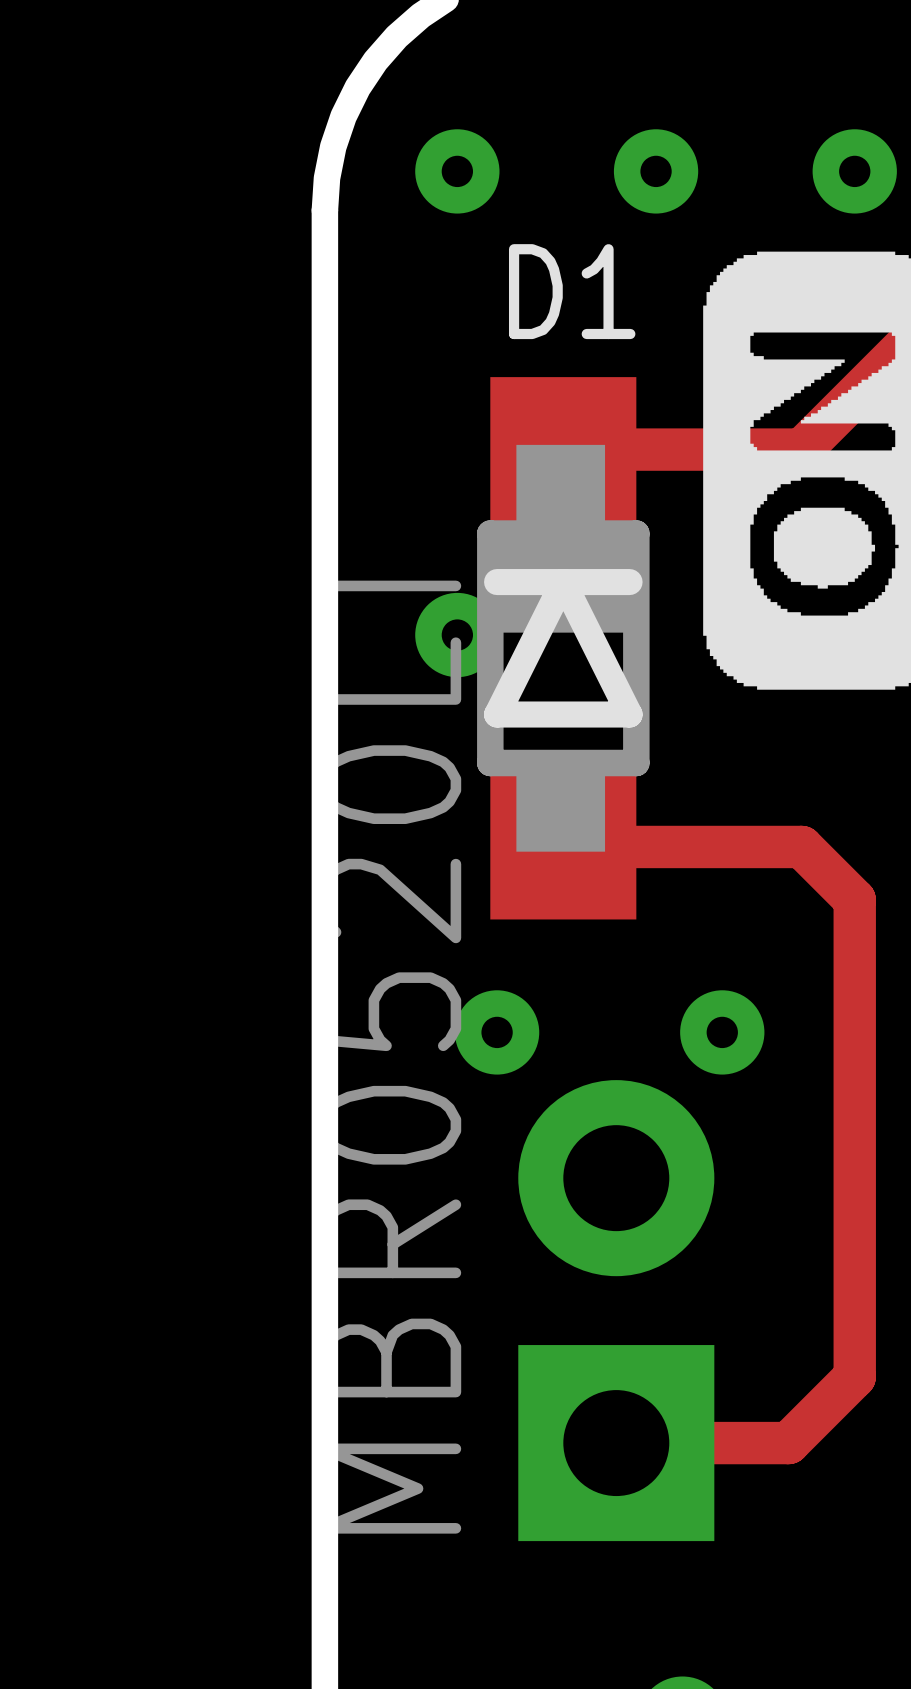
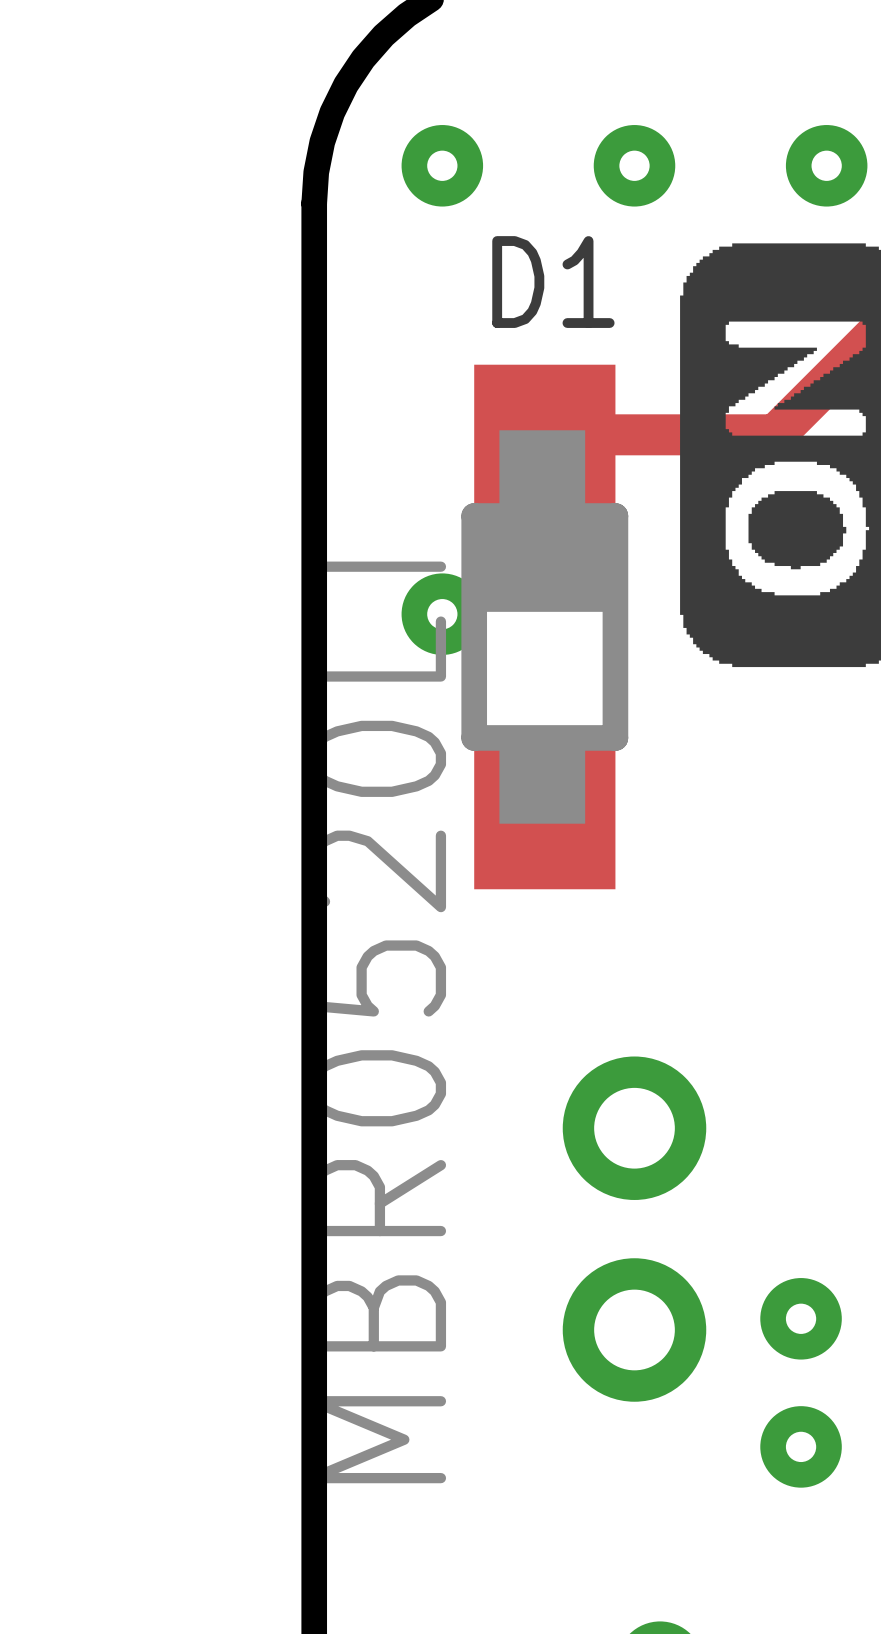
D1 footprint: [477, 377, 650, 920] -> [461, 364, 629, 890]
track: (563, 846) (801, 846) (854, 899) (854, 1376) (788, 1443) (616, 1443) -> none
via: (497, 1032) -> none
via: (722, 1032) -> none
part footprint: [518, 1080, 715, 1542] -> [562, 1056, 707, 1402]
via: none -> (801, 1318)
via: none -> (801, 1446)

